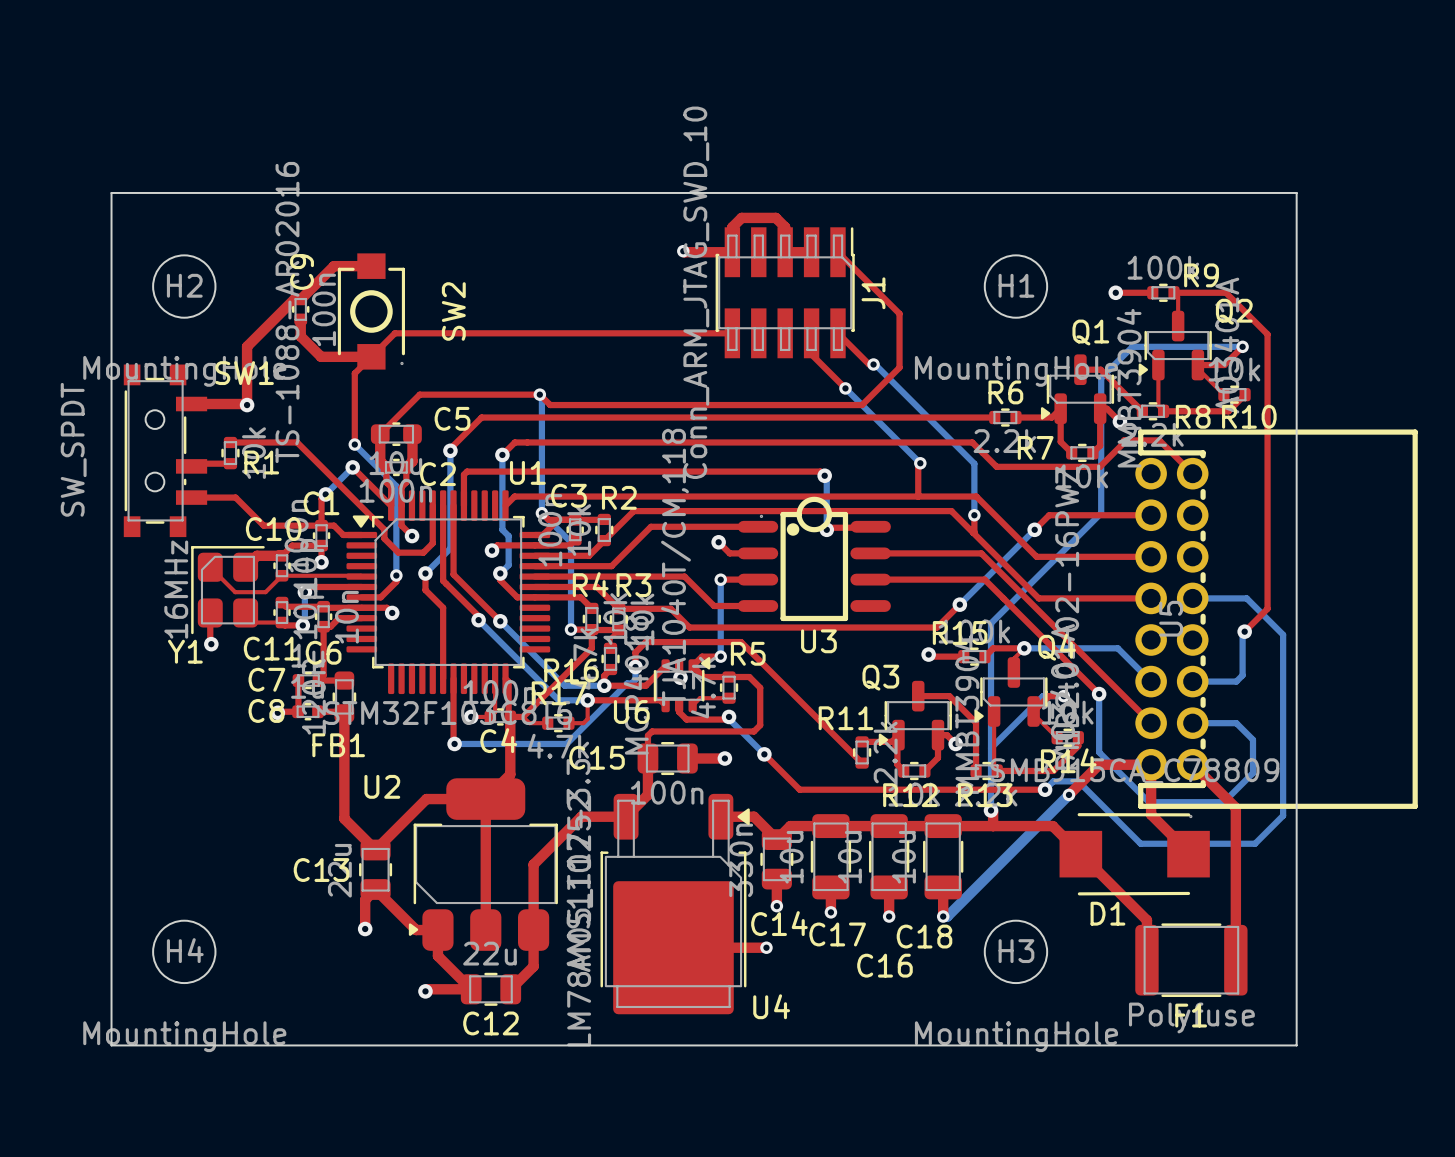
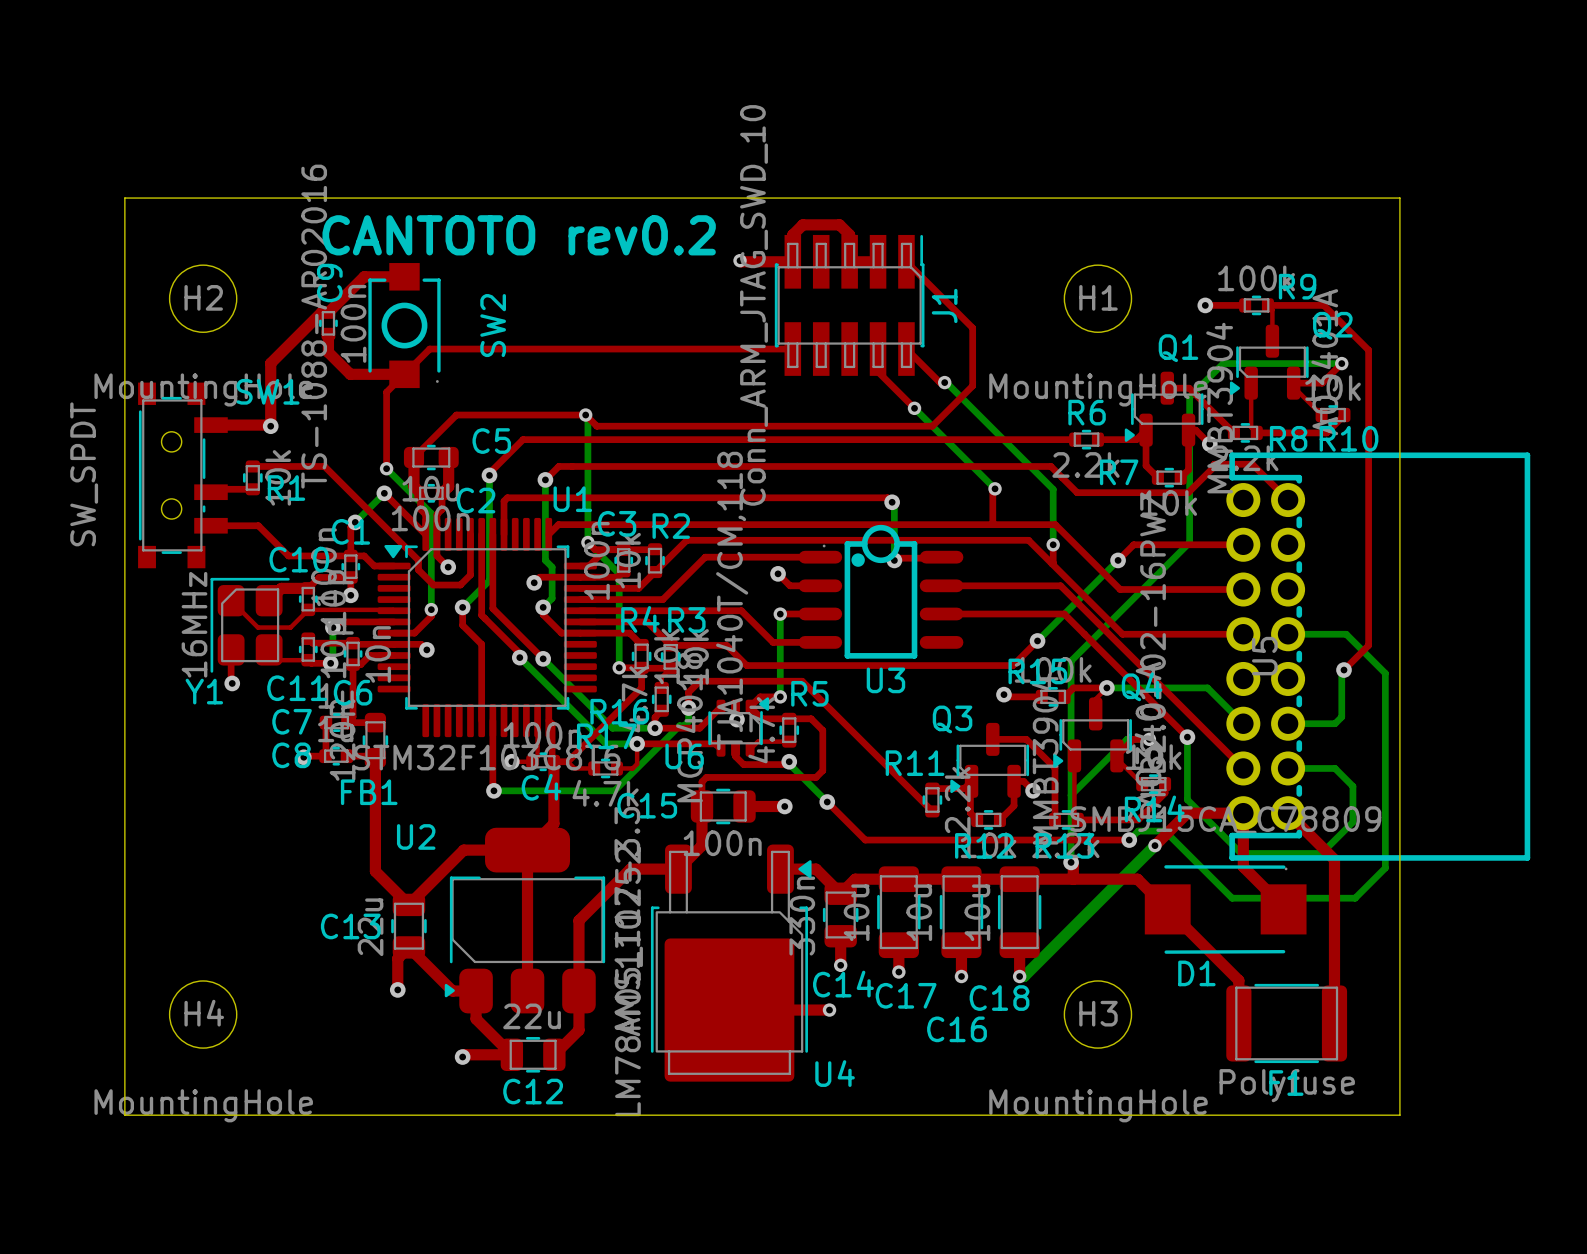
text: none -> CANTOTO rev0.2 (519, 235)

